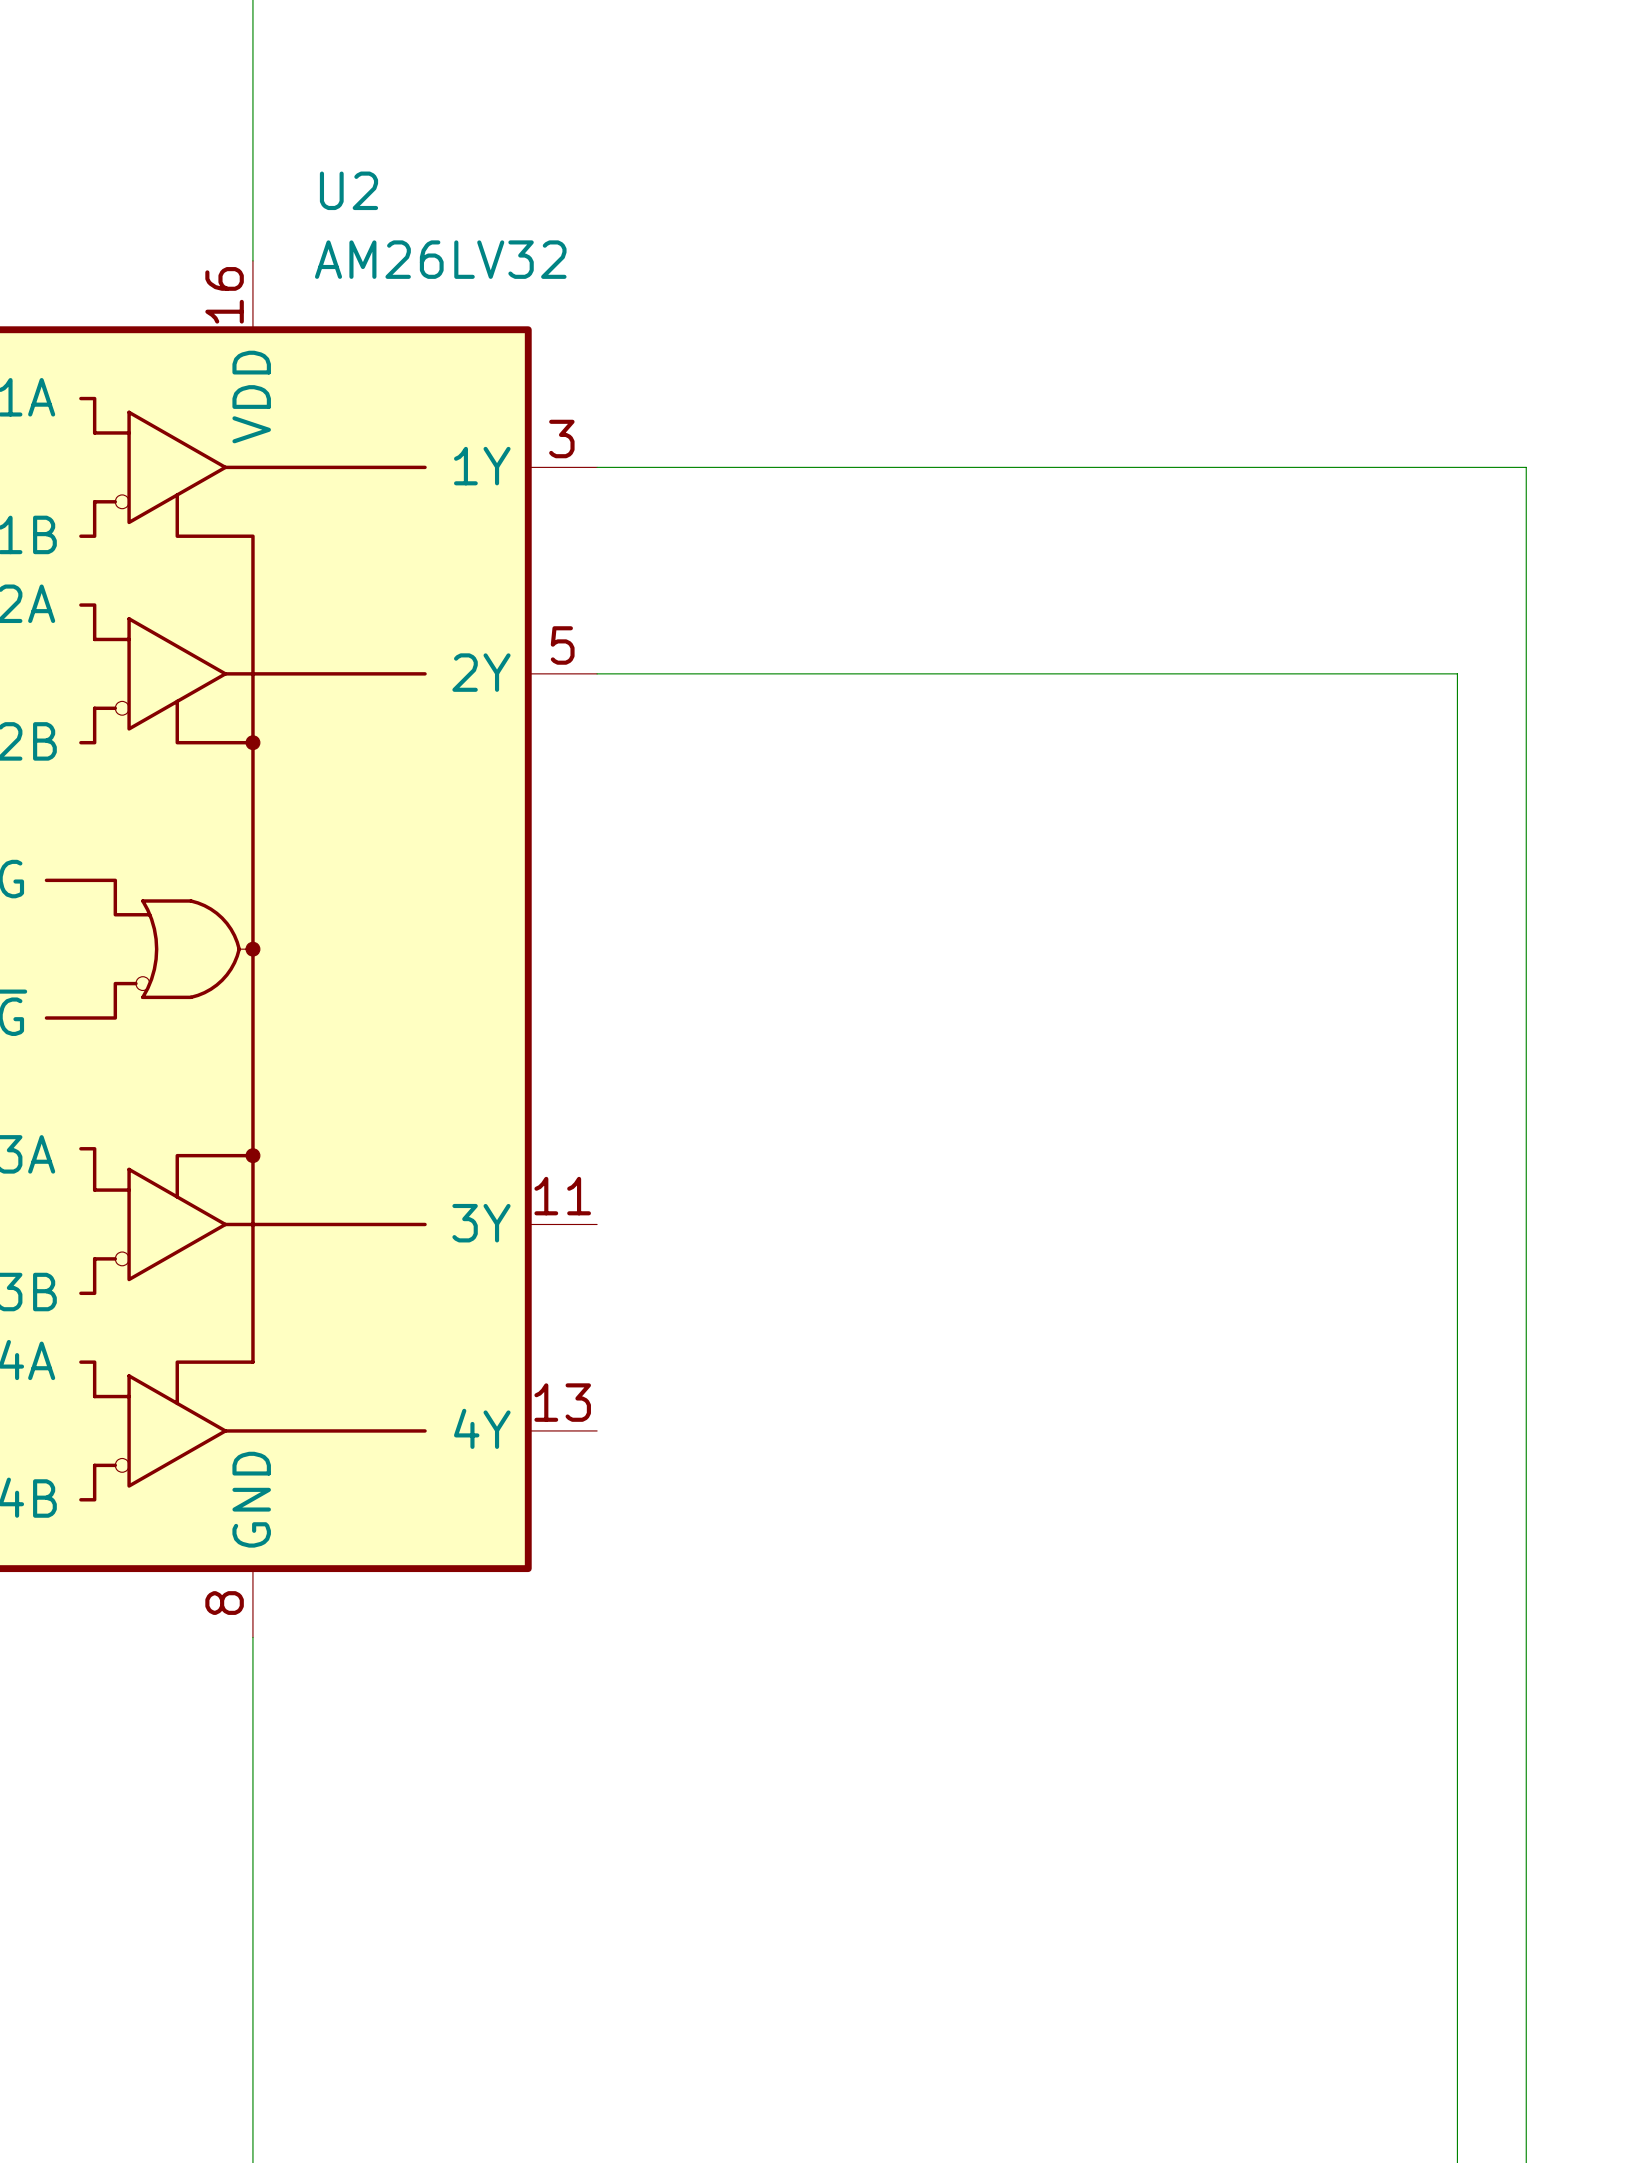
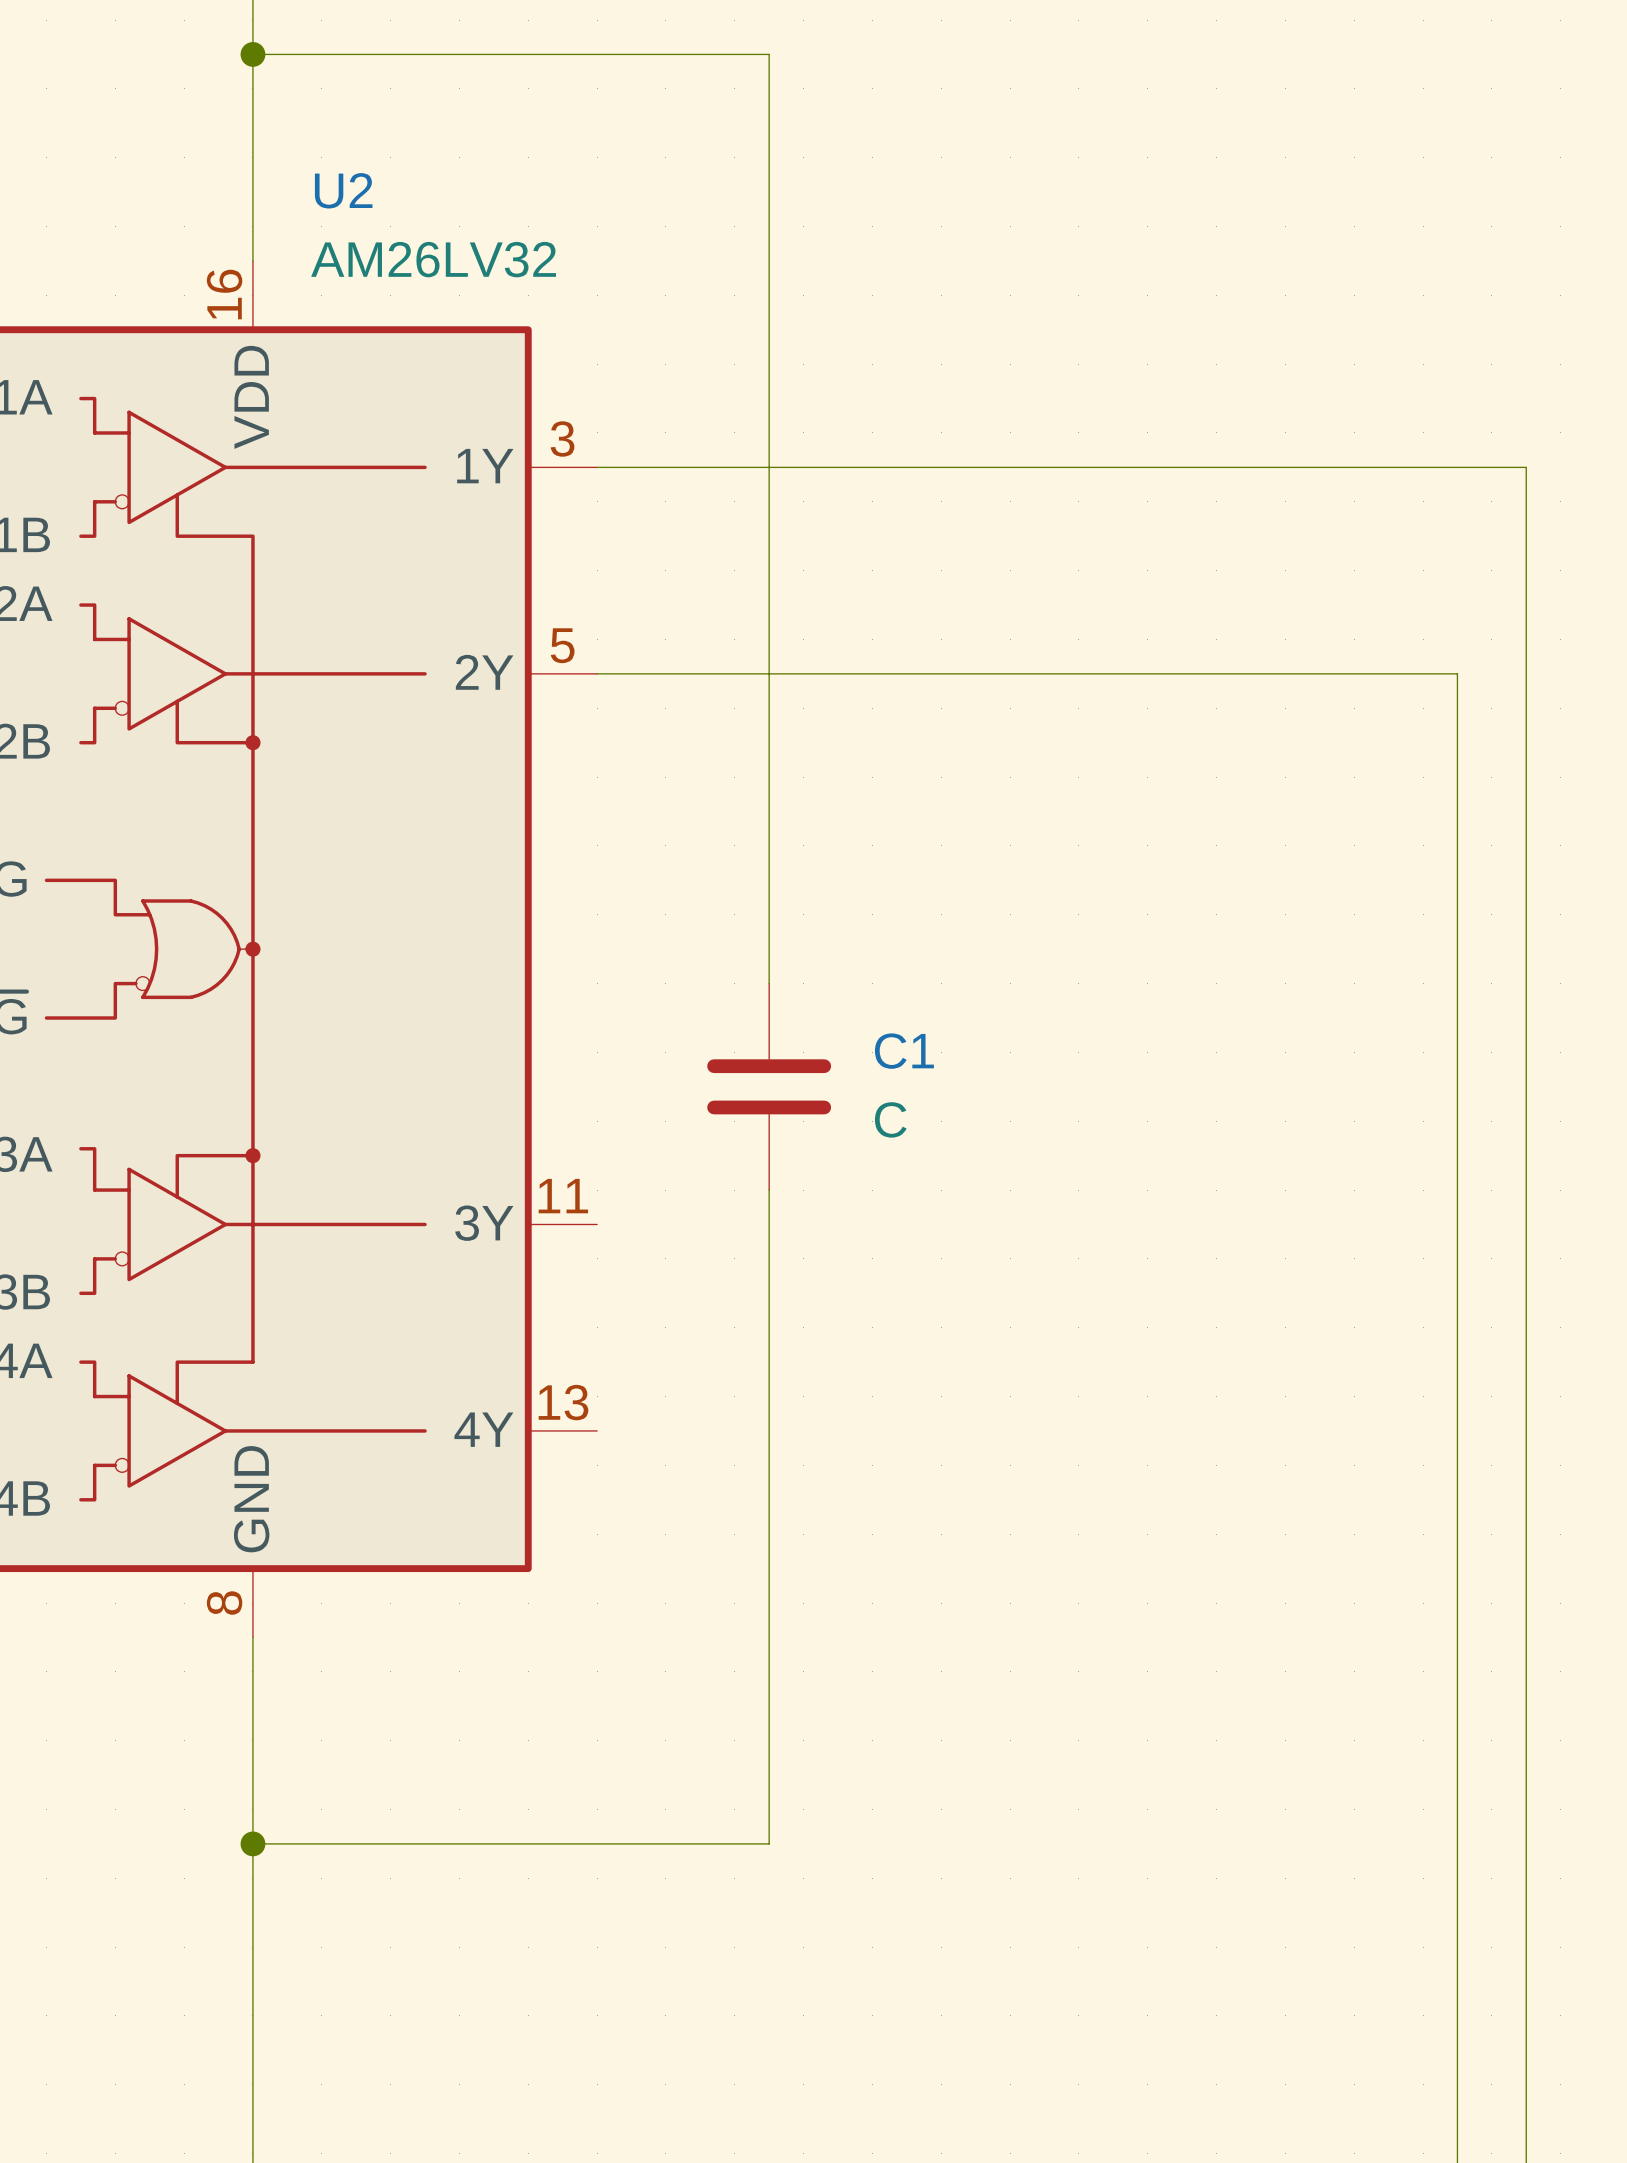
wire: none -> (252, 54) (769, 54) (769, 983)
junction: none -> (252, 54)
C1: none -> C (769, 1086)
wire: none -> (769, 1190) (769, 1843) (252, 1843)
junction: none -> (252, 1843)

